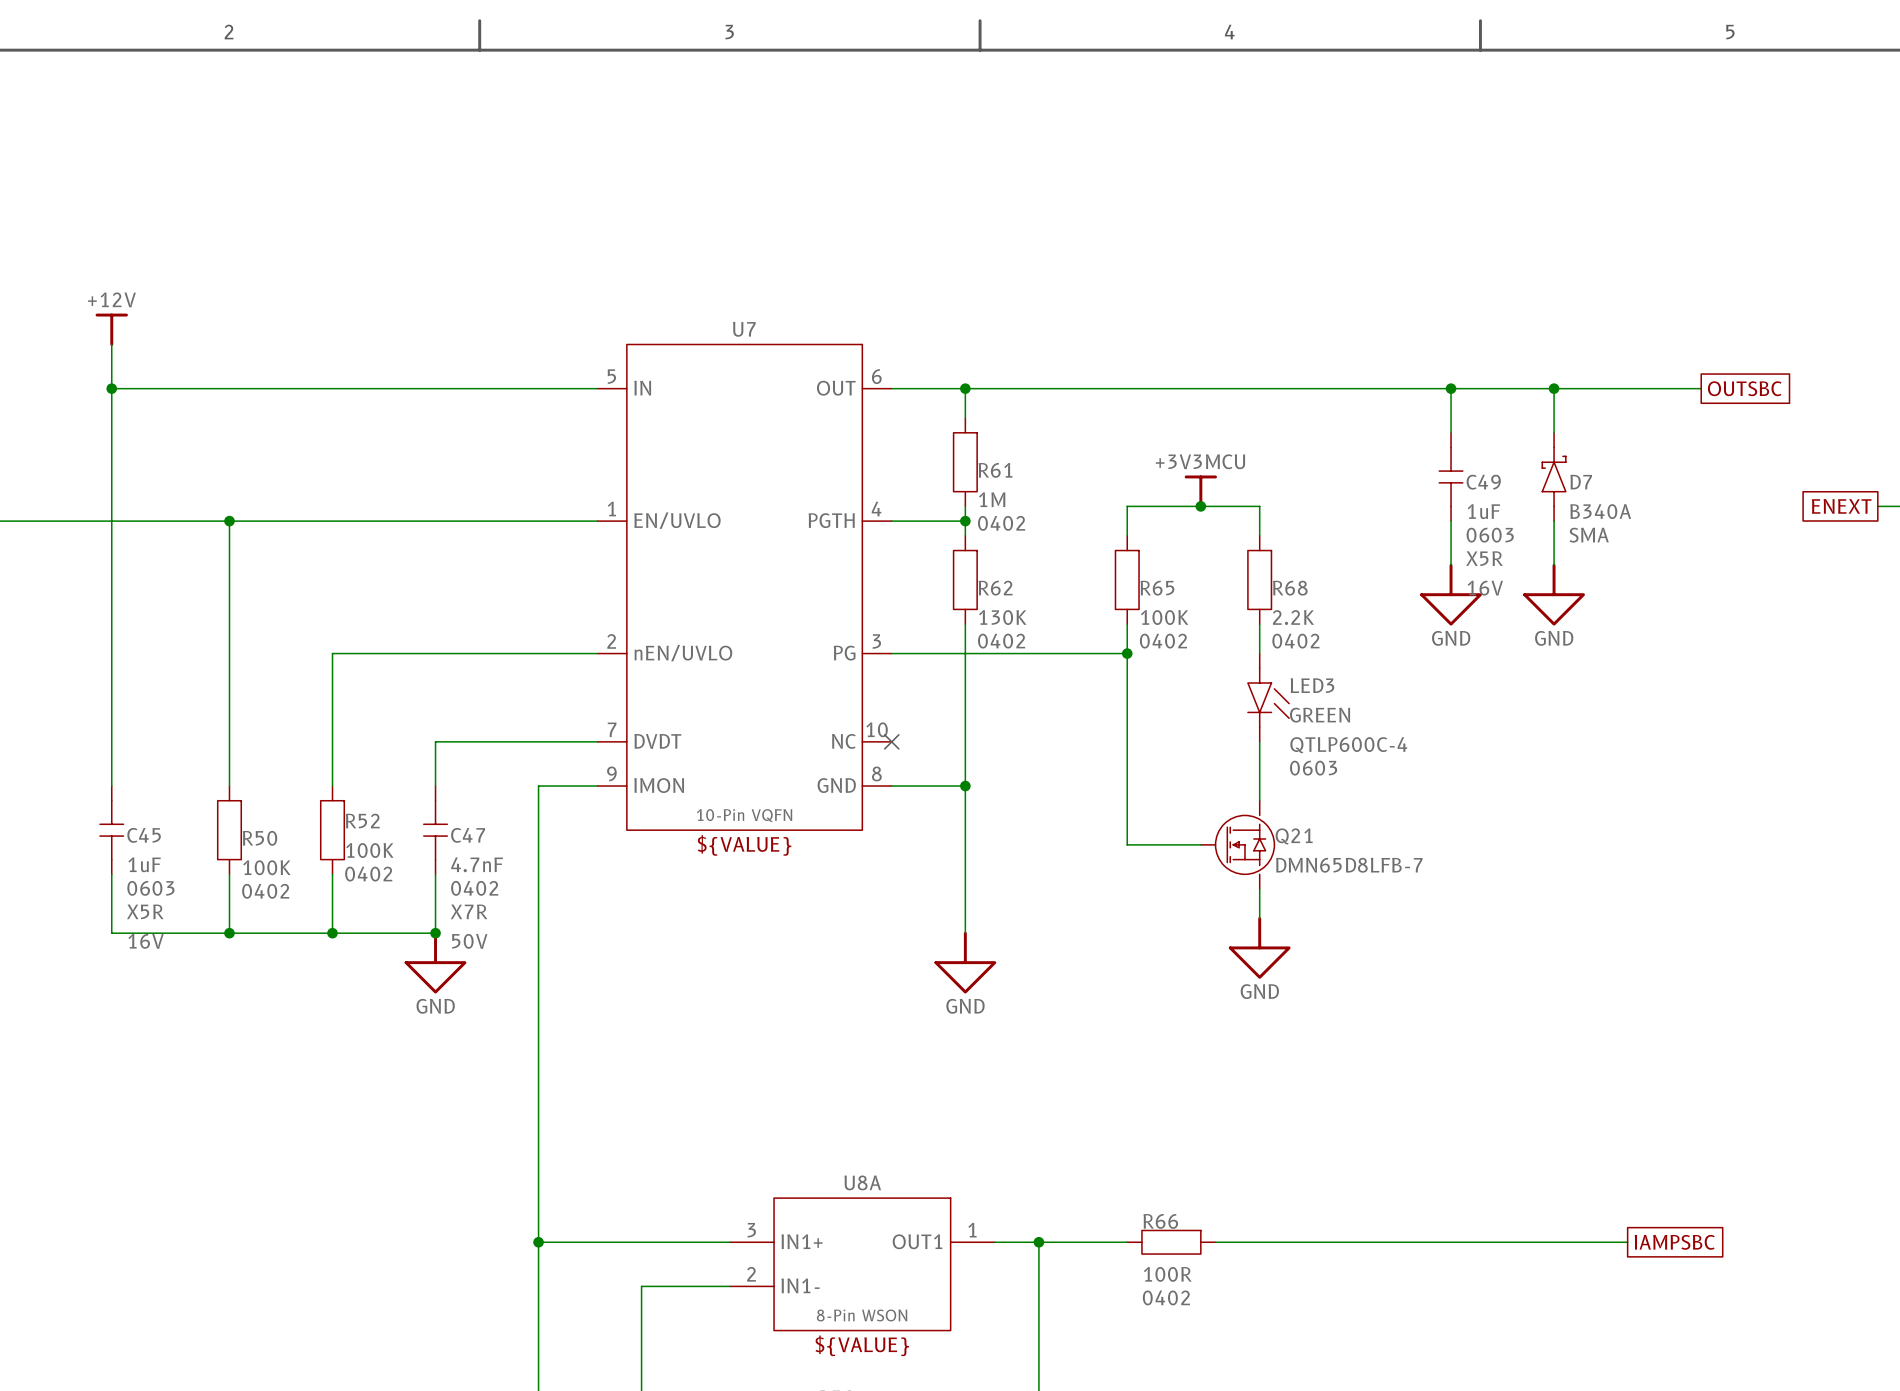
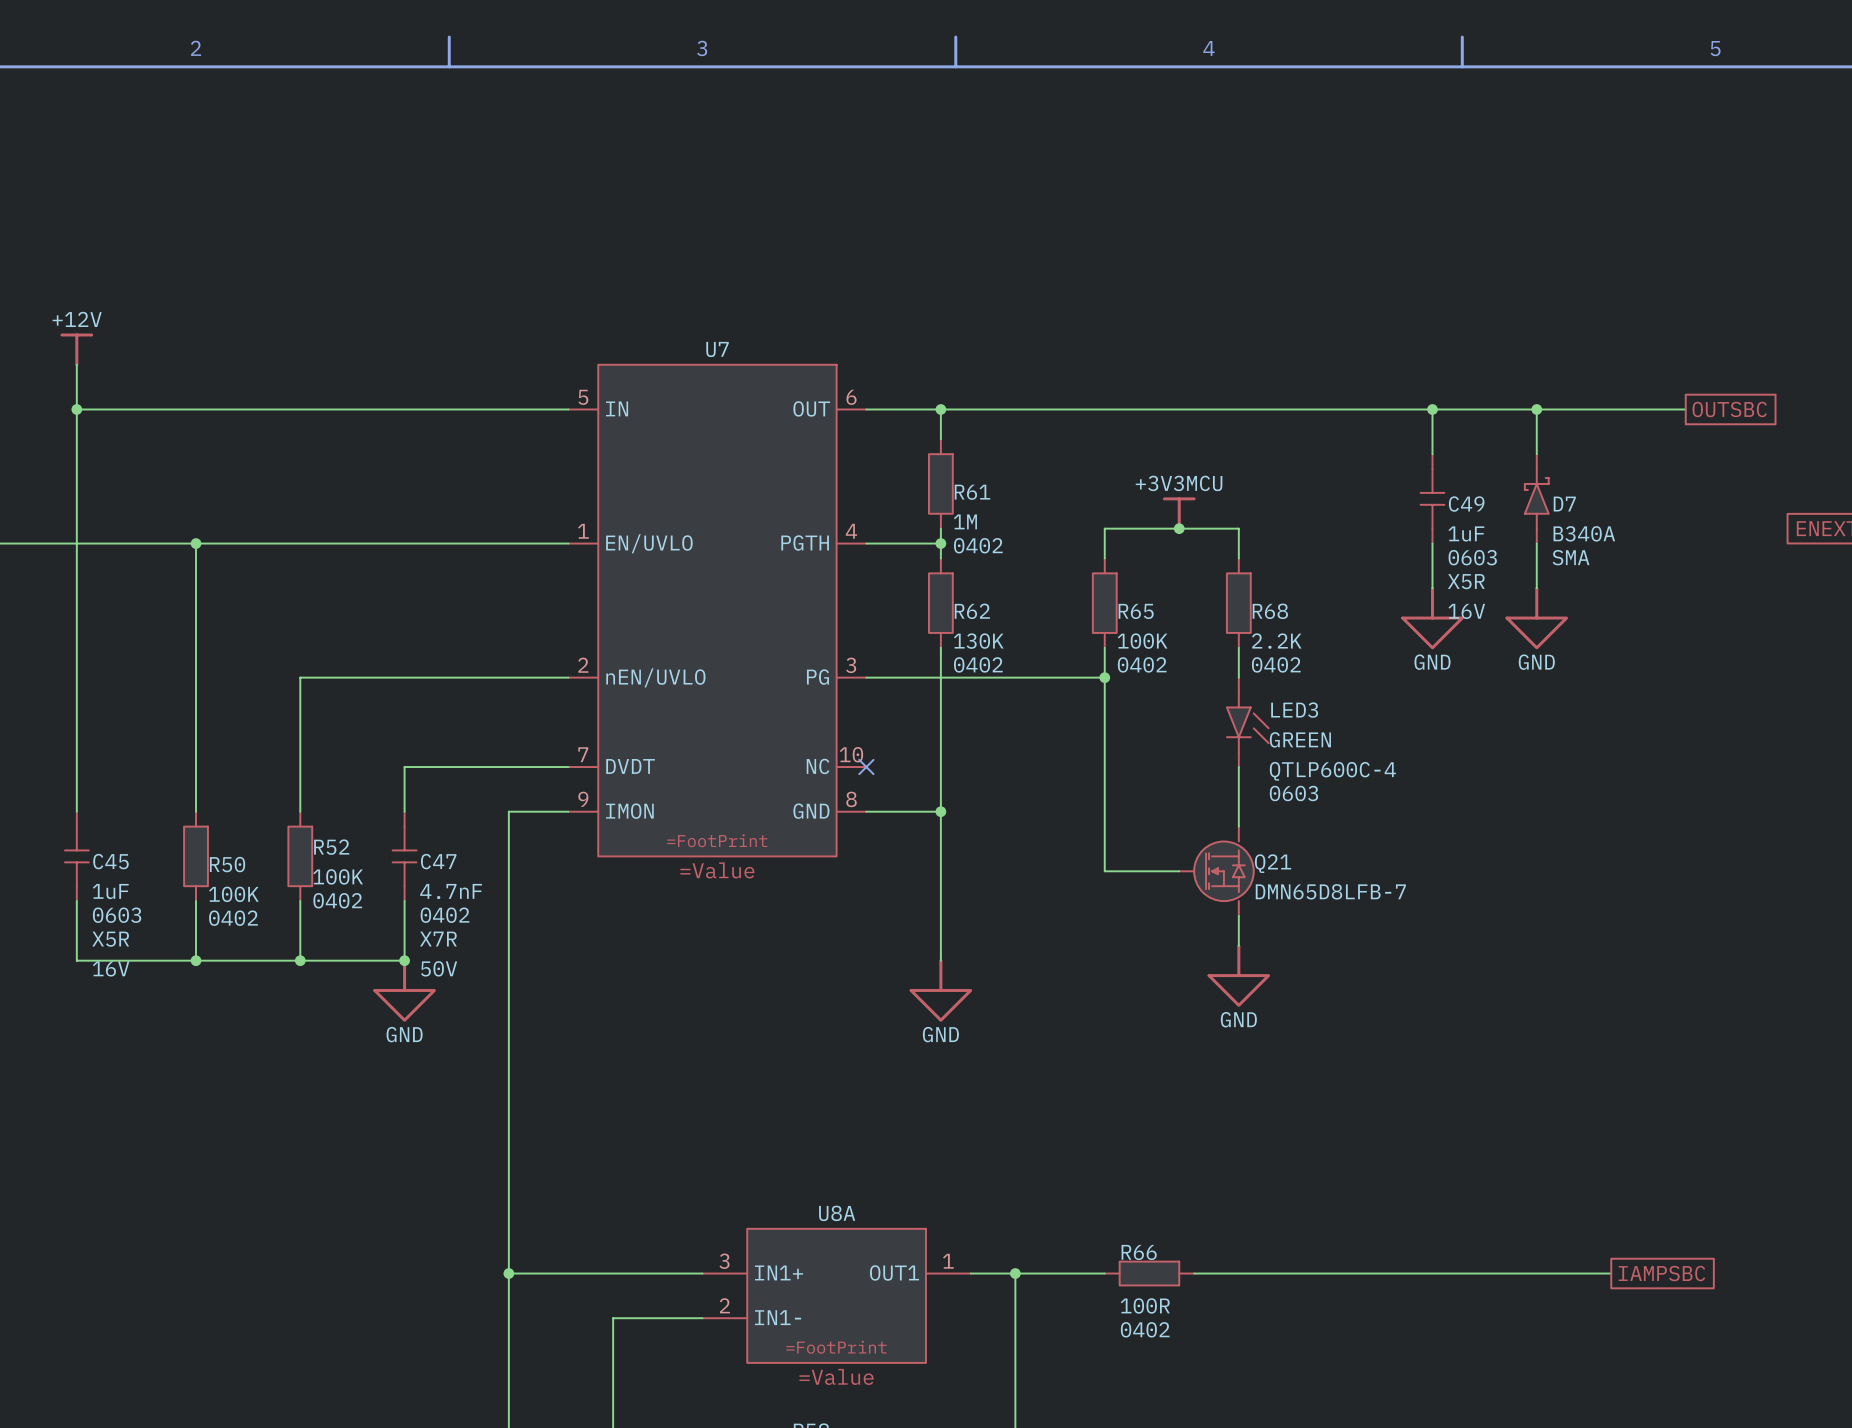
U7 text: none -> =FootPrint (717, 840)
U7 text: 10-Pin VQFN (744, 815) -> none
U7 text: ${VALUE} (744, 845) -> =Value (717, 870)
U8A text: none -> =FootPrint (836, 1347)
U8A text: 8-Pin WSON (862, 1315) -> none
U8A text: ${VALUE} (862, 1345) -> =Value (836, 1376)

